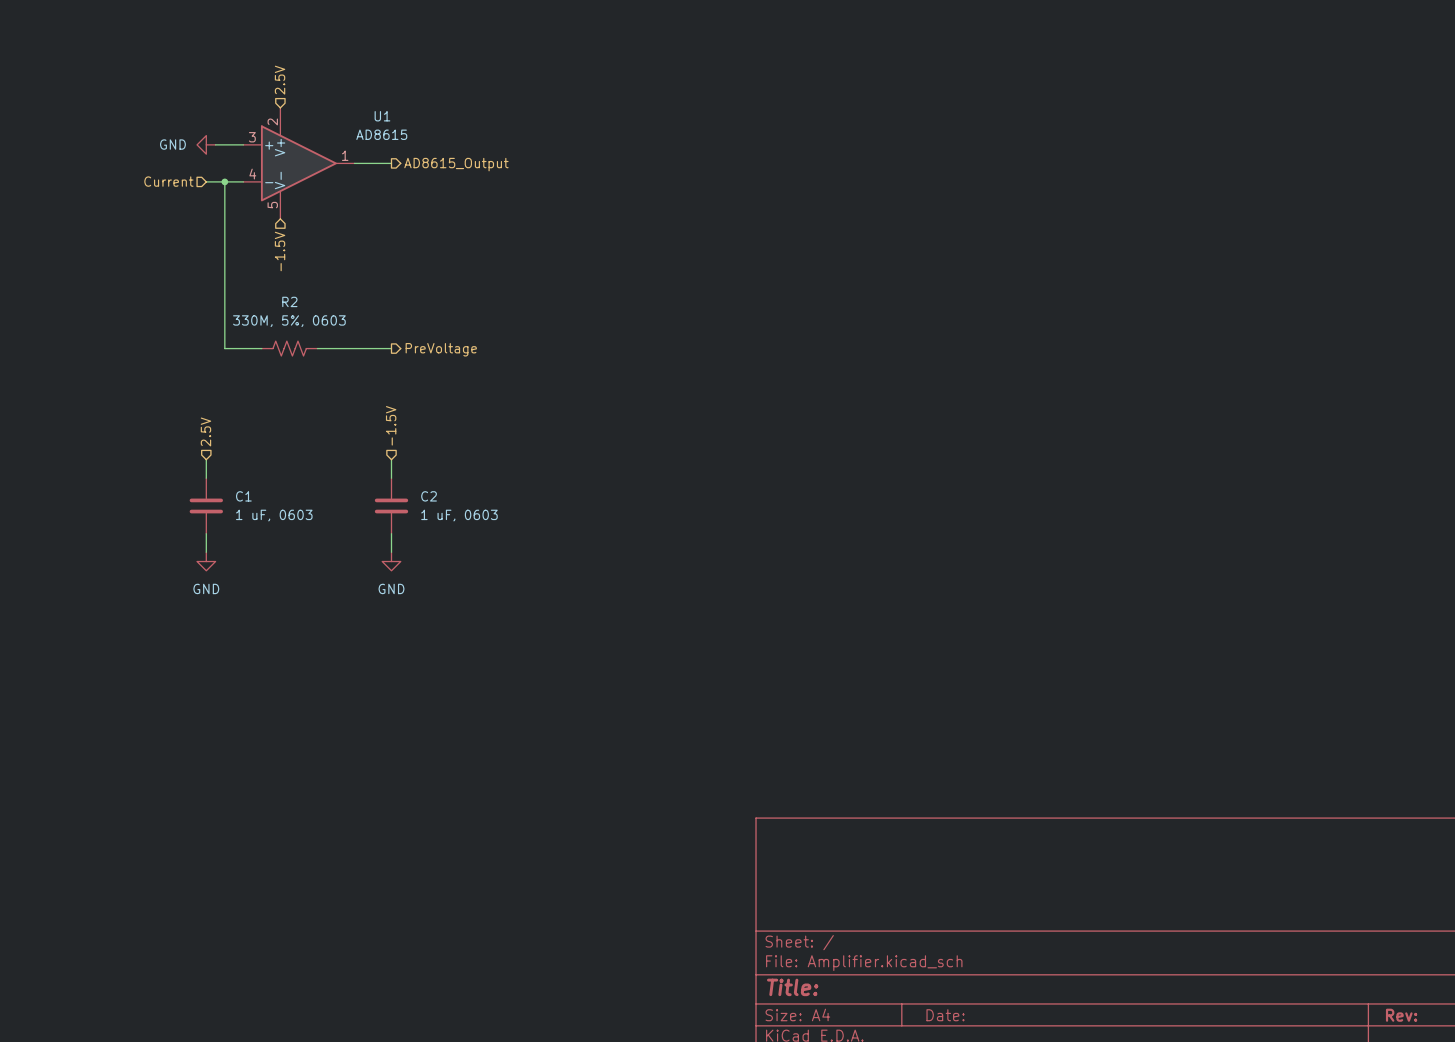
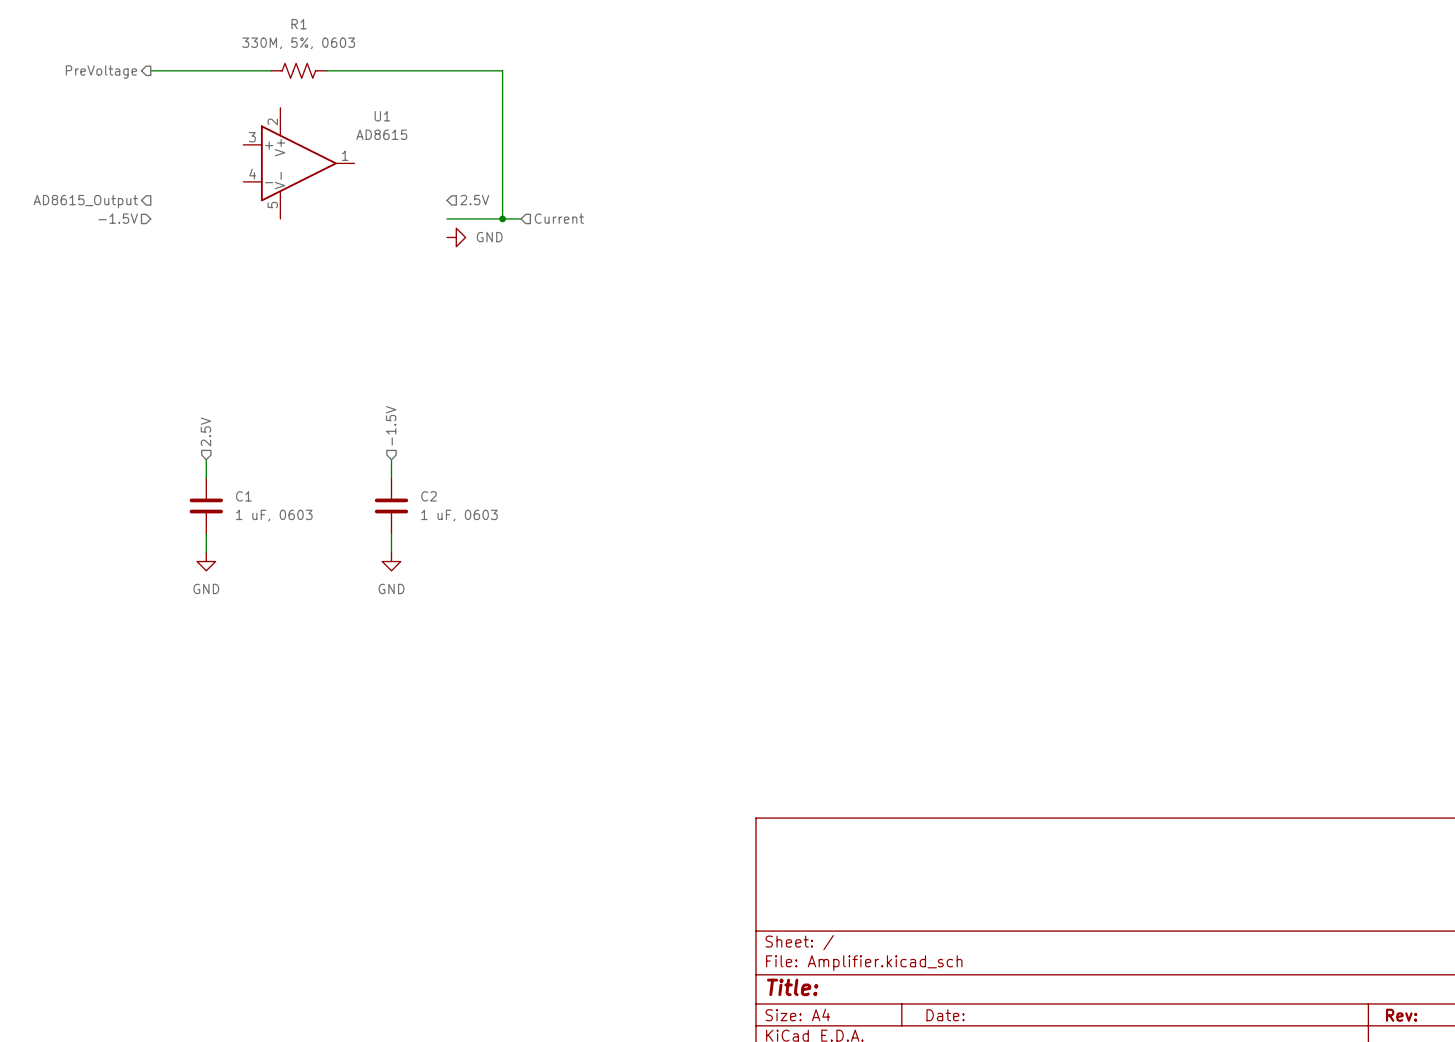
wire: none -> (150, 70) (271, 70)
R1: none -> 330M, 5%, 0603 (298, 70)
wire: none -> (326, 70) (502, 70) (502, 218)
hierarchical label: none -> PreVoltage (101, 72)
hierarchical label: 2.5V (280, 80) -> none
power symbol: GND (206, 144) -> none
wire: (215, 144) (243, 144) -> none
wire: (354, 163) (391, 163) -> none
hierarchical label: AD8615_Output (456, 164) -> none
hierarchical label: Current (168, 181) -> none
wire: (206, 181) (243, 181) -> none
wire: (224, 181) (224, 348) (261, 348) -> none
junction: (224, 181) -> none
hierarchical label: none -> 2.5V (474, 200)
hierarchical label: none -> AD8615_Output (85, 201)
wire: none -> (447, 218) (521, 218)
junction: none -> (502, 218)
hierarchical label: none -> Current (559, 218)
power symbol: none -> GND (456, 237)
hierarchical label rotation: 0° (280, 251) -> 90° clockwise (118, 218)
hierarchical label position: -1.5V (280, 251) -> -1.5V (118, 218)
R2: 330M, 5%, 0603 (289, 348) -> none
wire: (317, 348) (391, 348) -> none
hierarchical label: PreVoltage (441, 349) -> none

